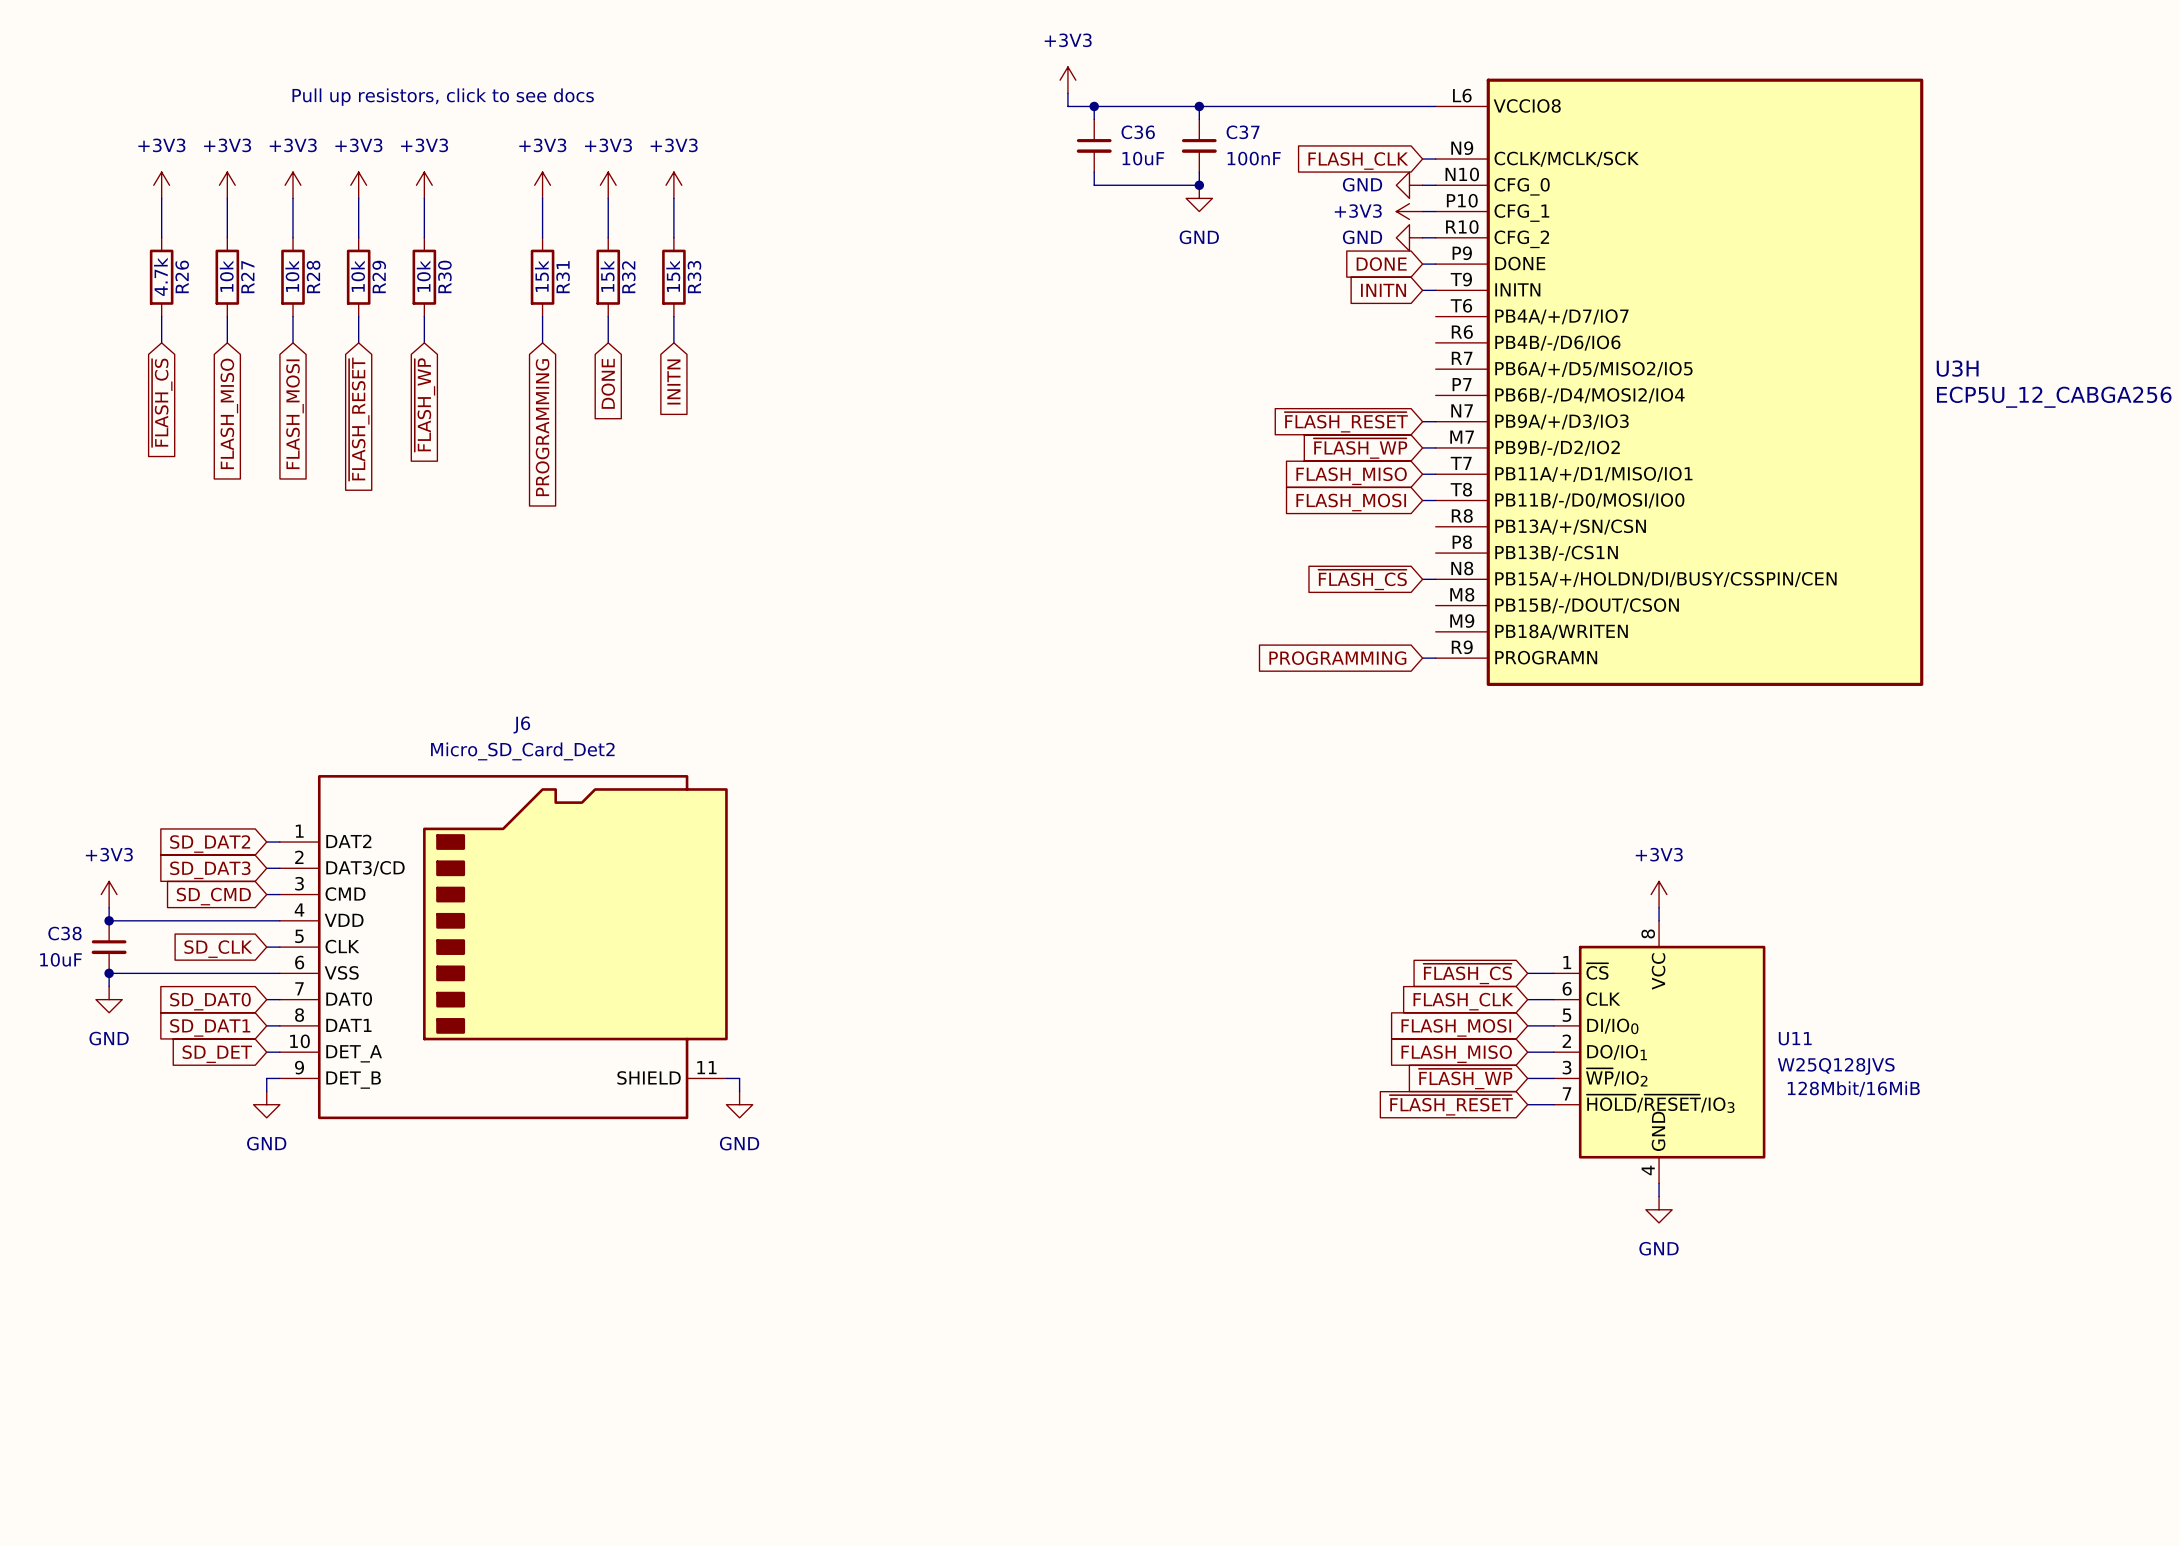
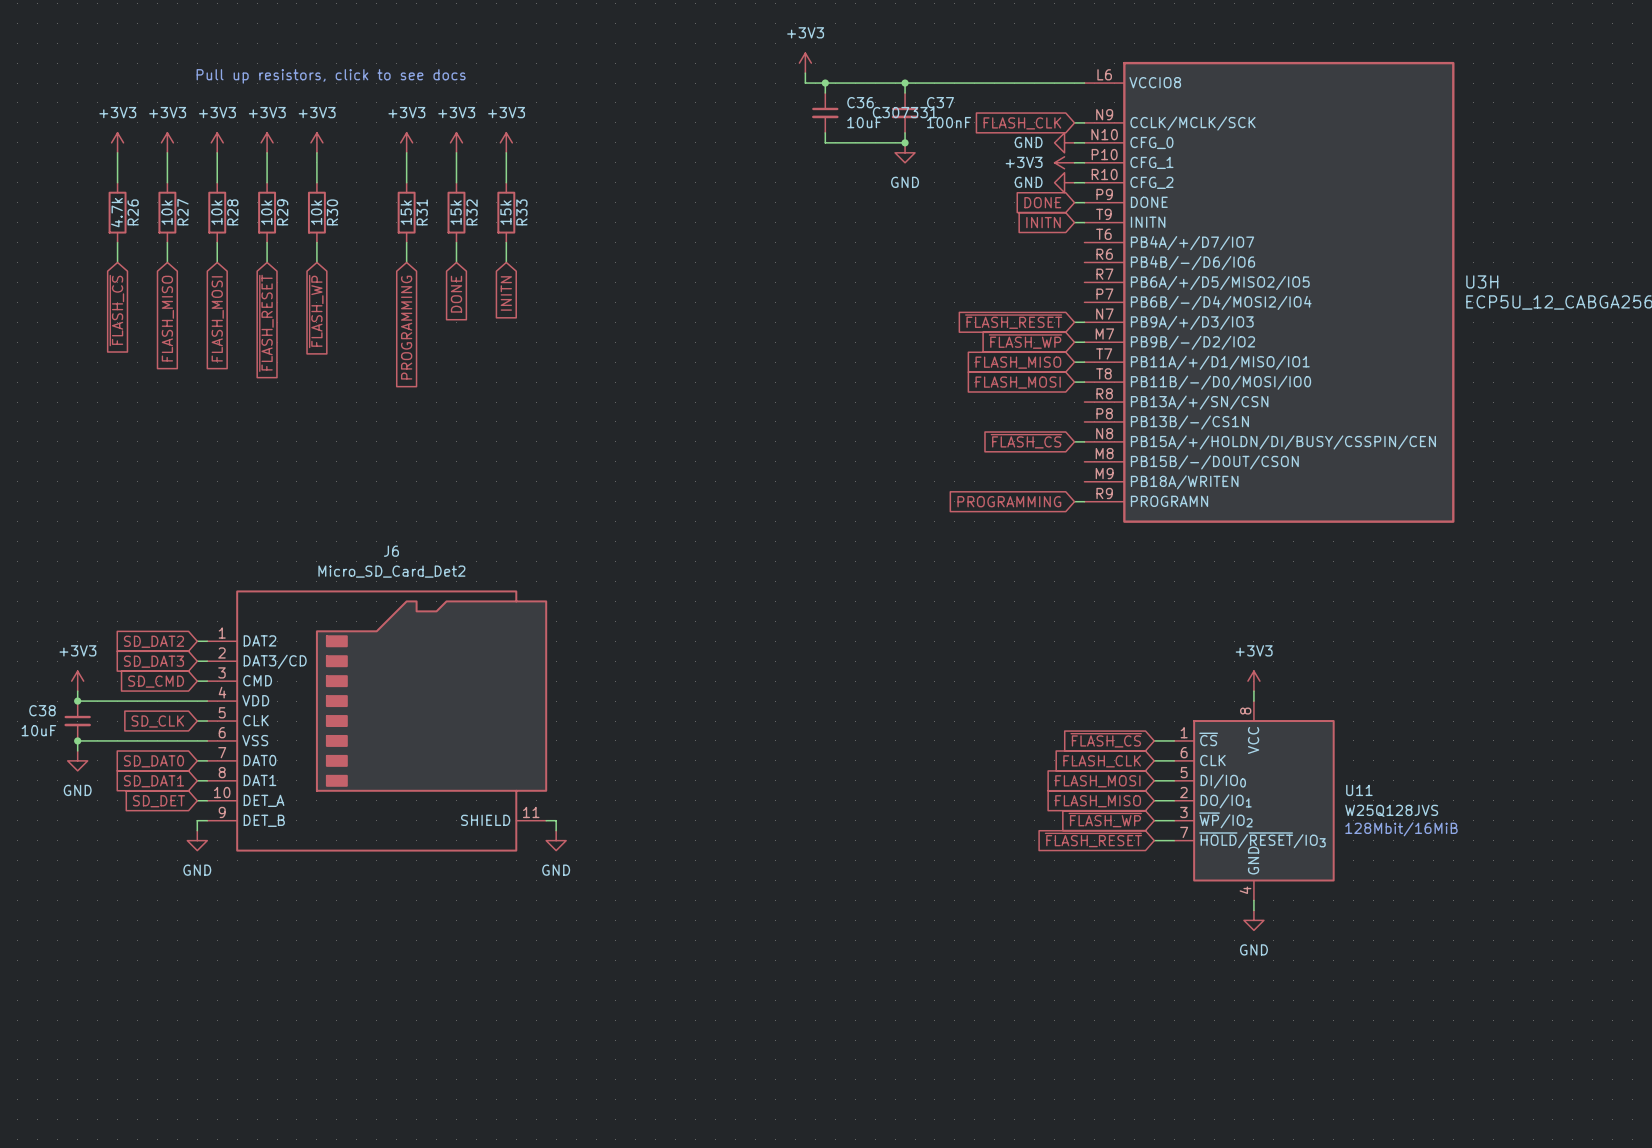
C37 text: none -> C307331 (905, 112)

